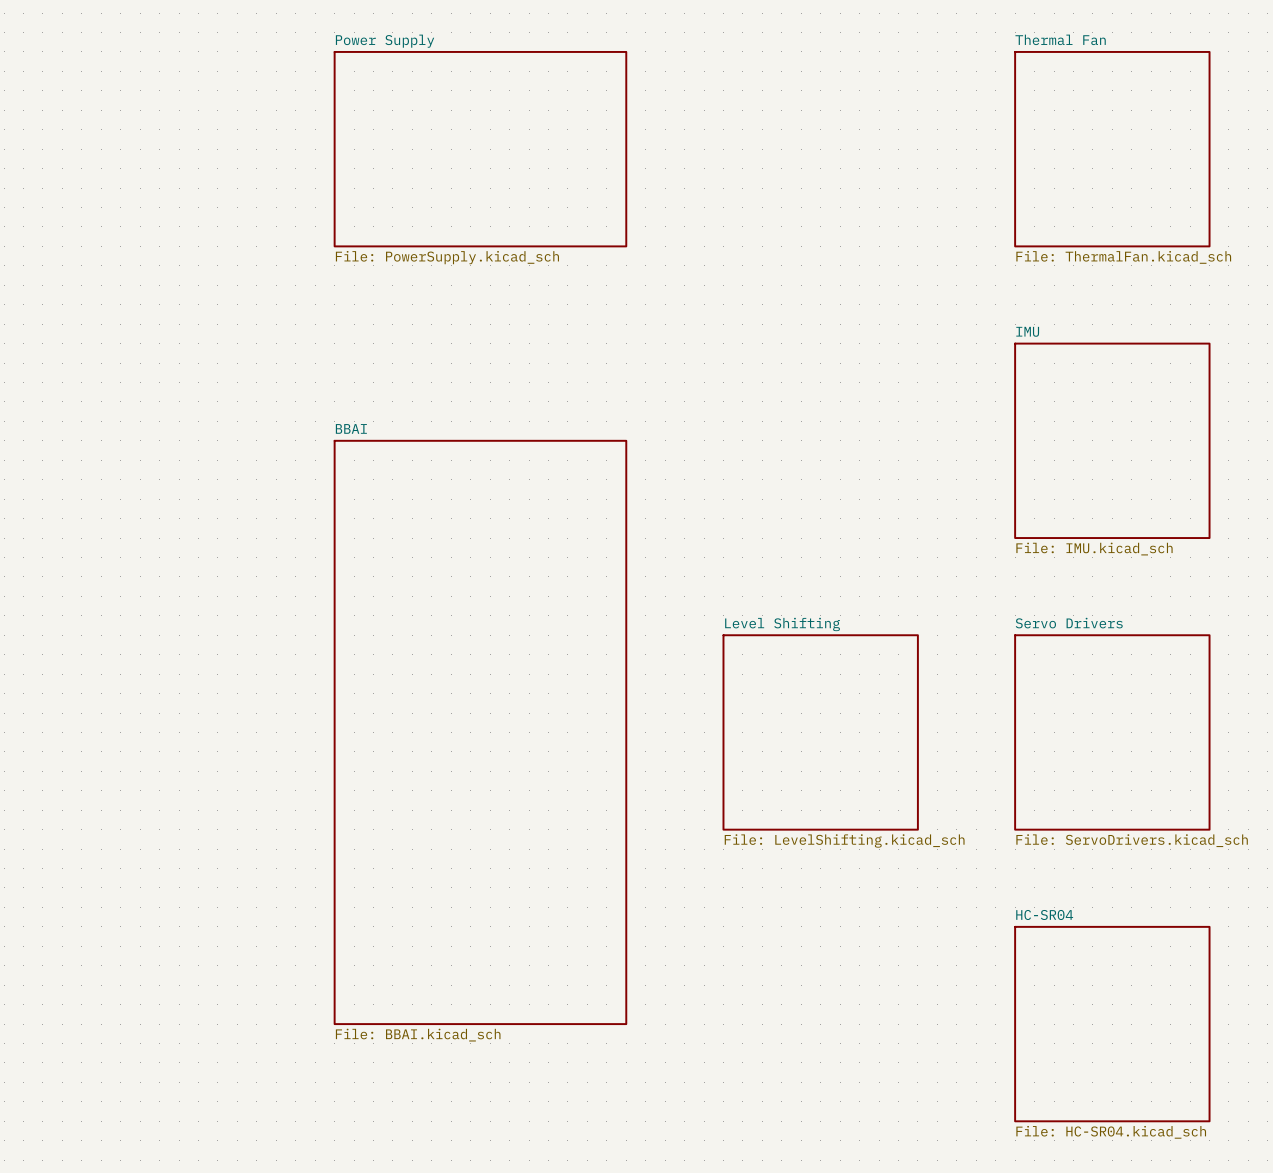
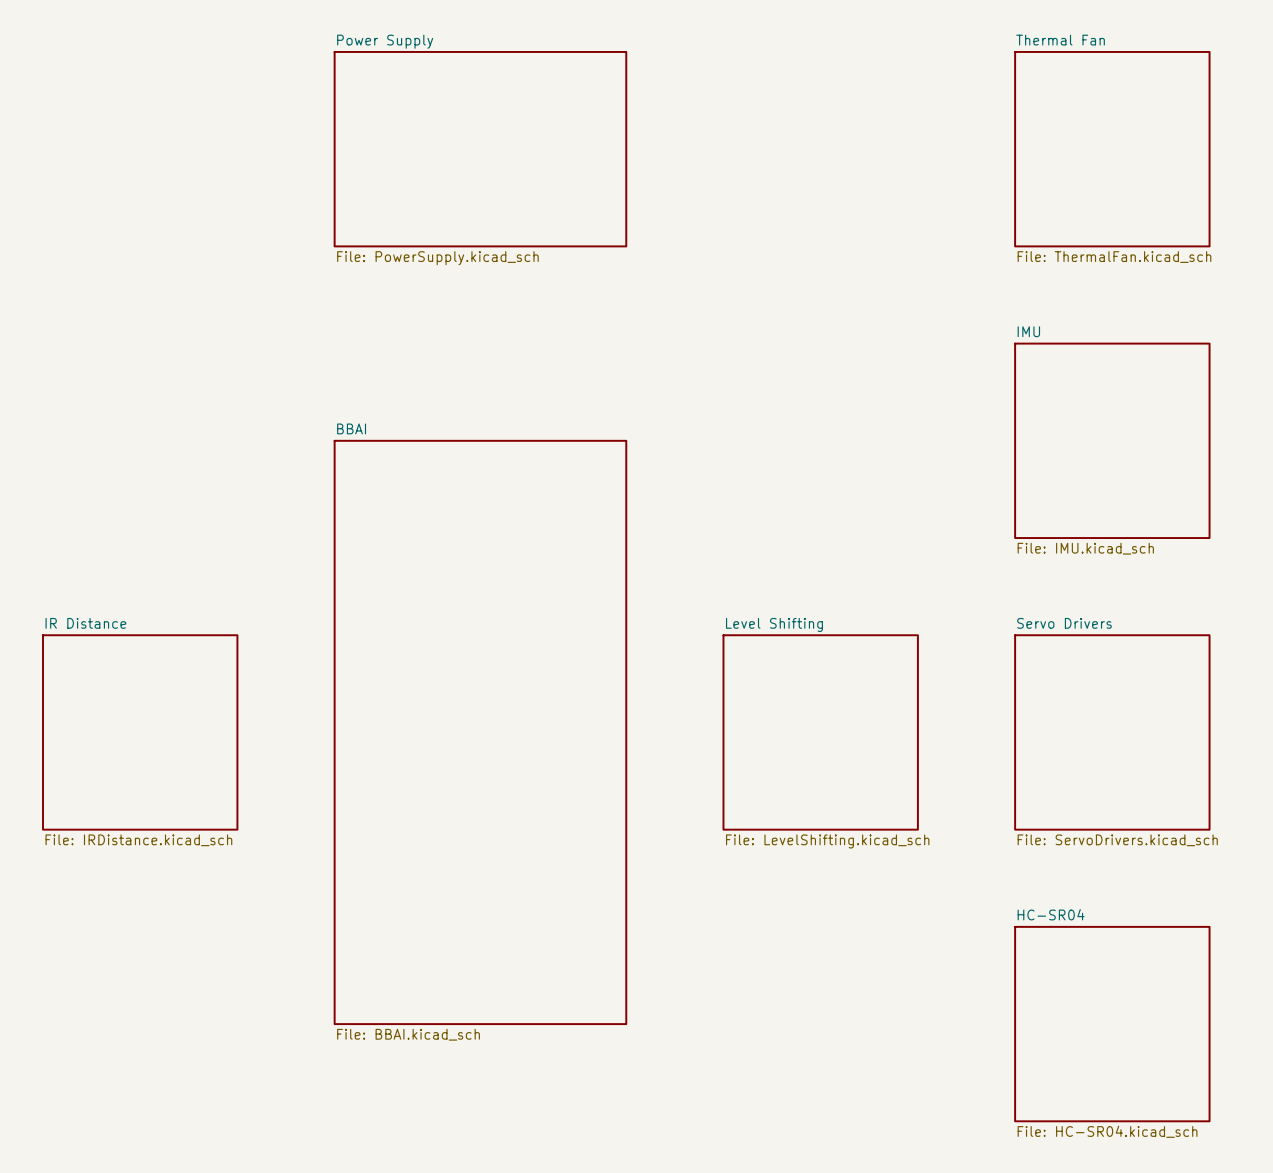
sheet IR Distance: none -> File: IRDistance.kicad_sch (140, 732)

